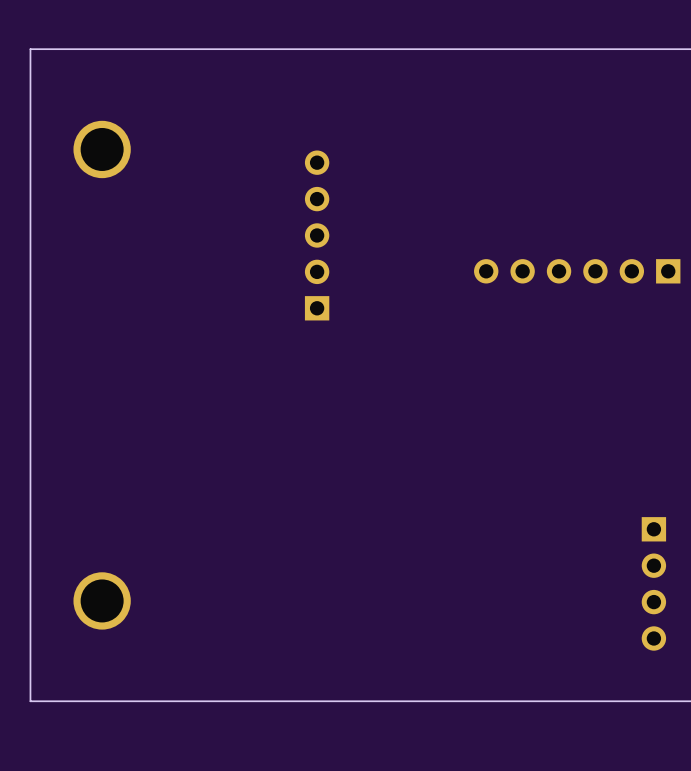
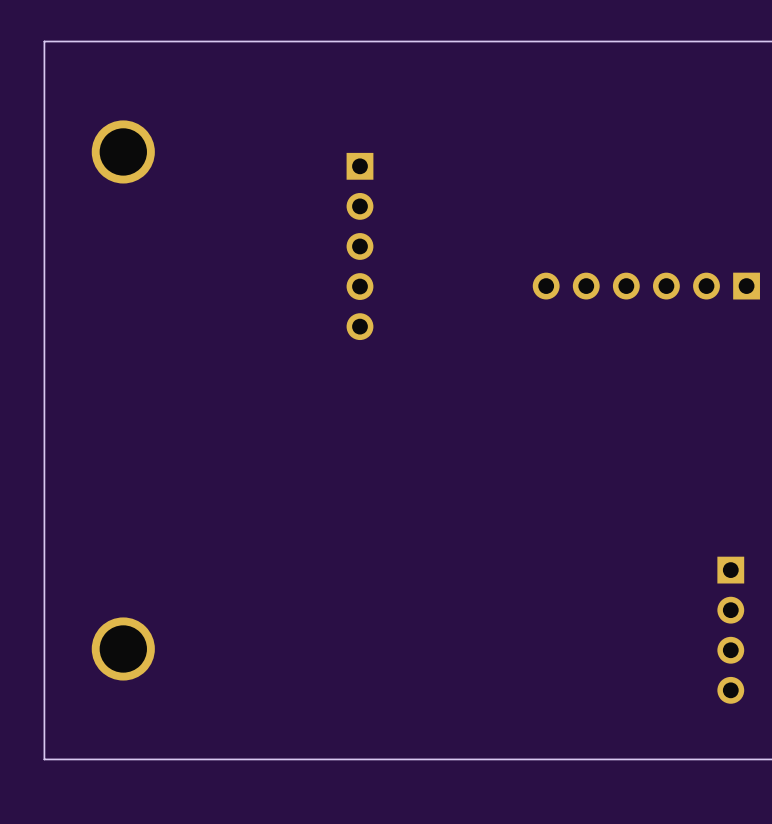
part rotation: 0° (317, 235) -> 180° (359, 246)

